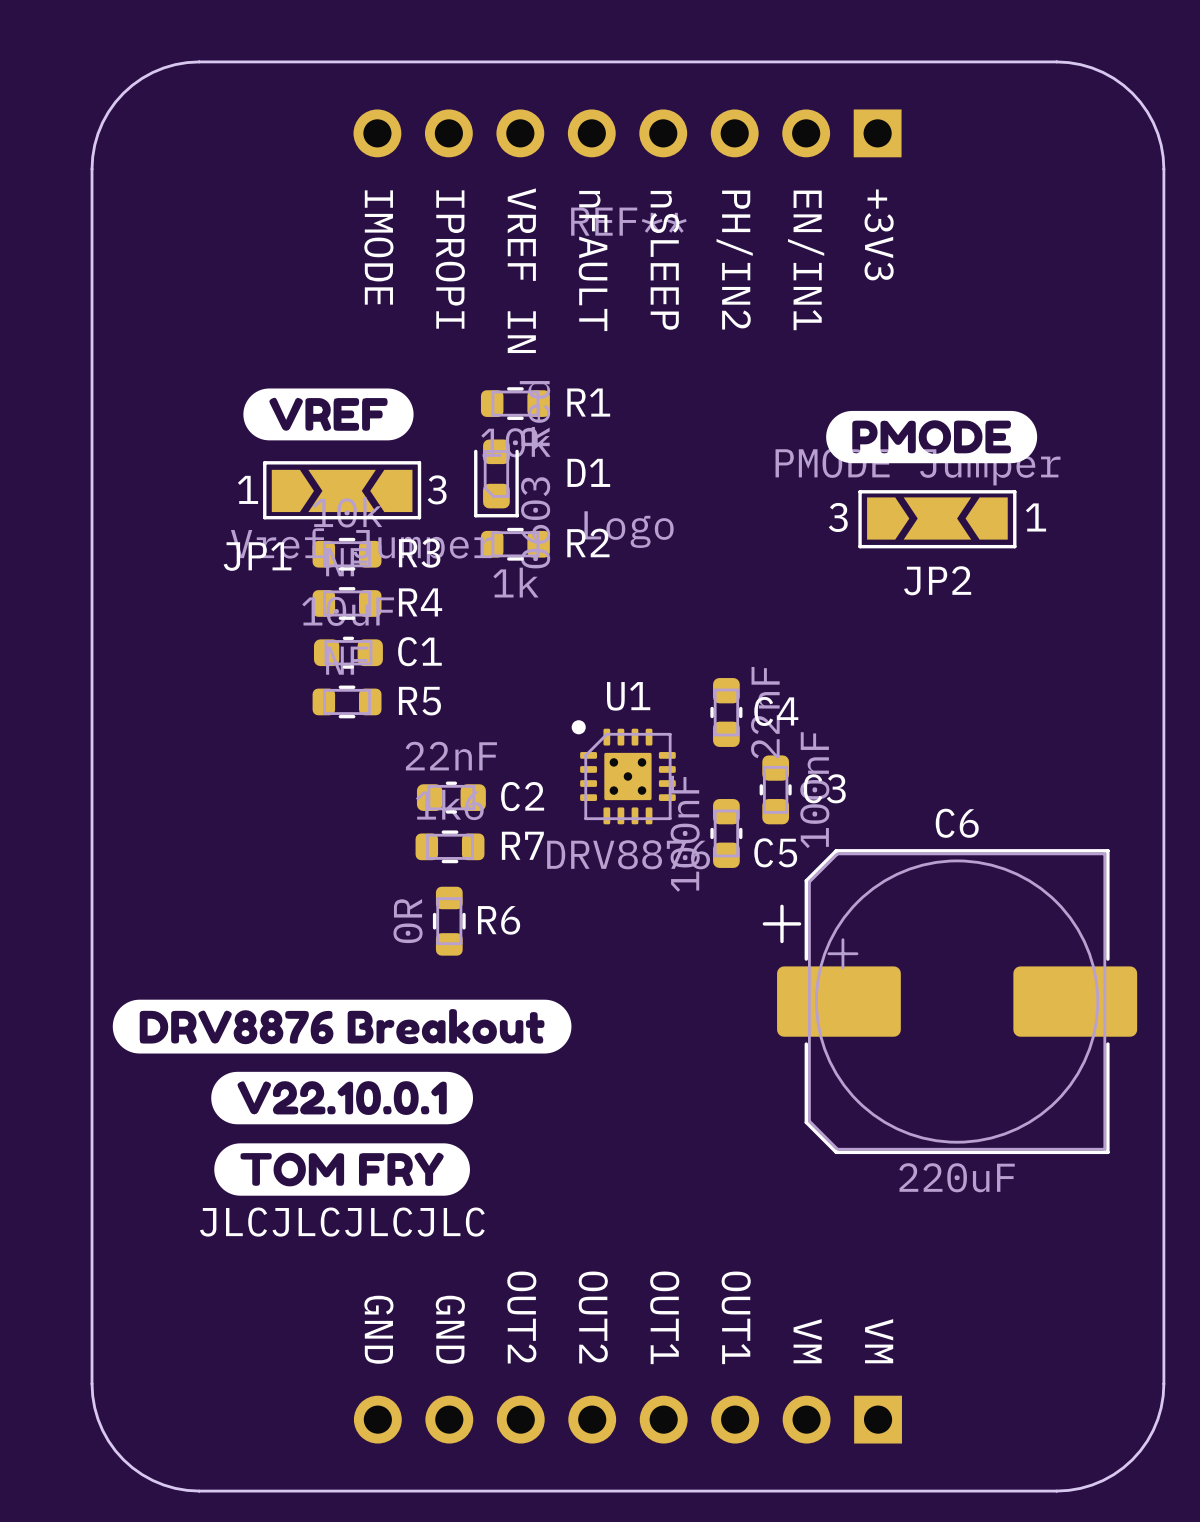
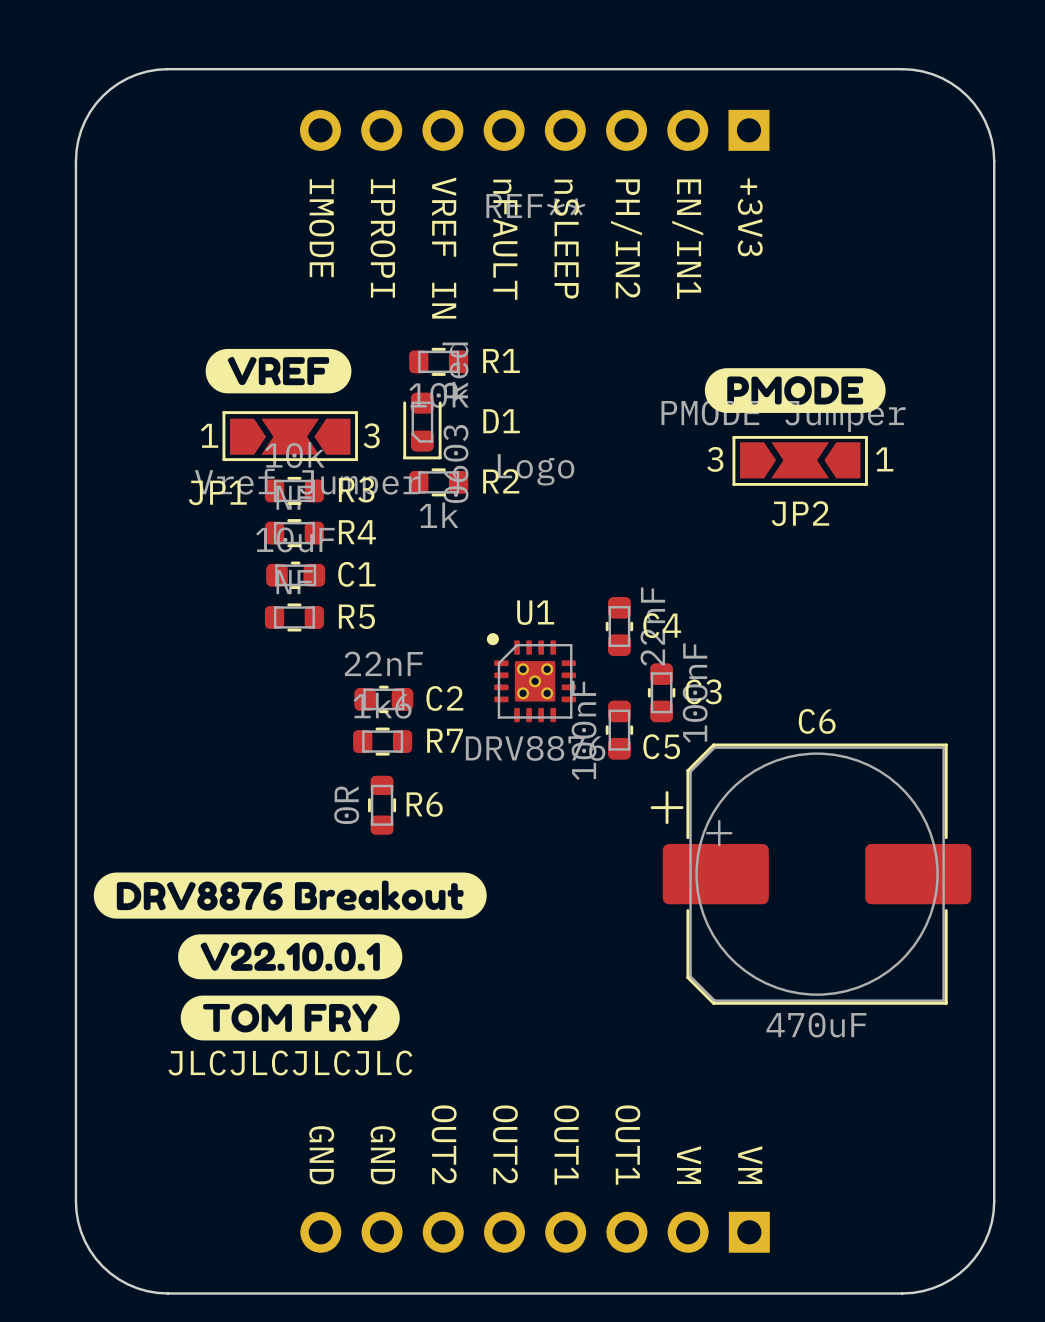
C6 value: 220uF (957, 1177) -> 470uF (816, 1025)

